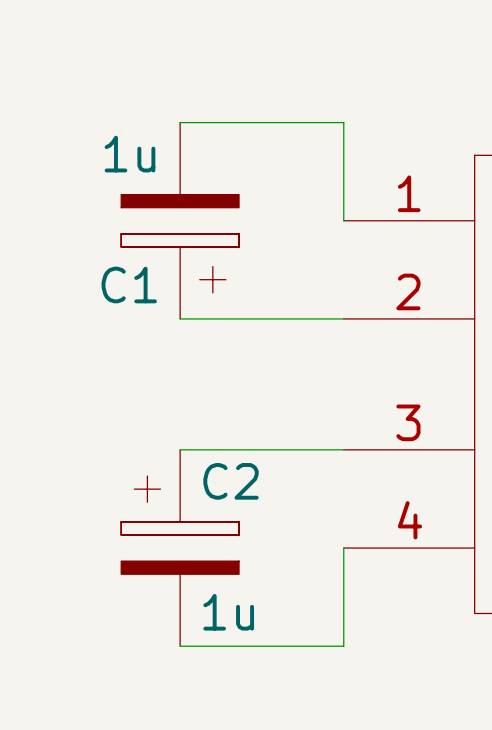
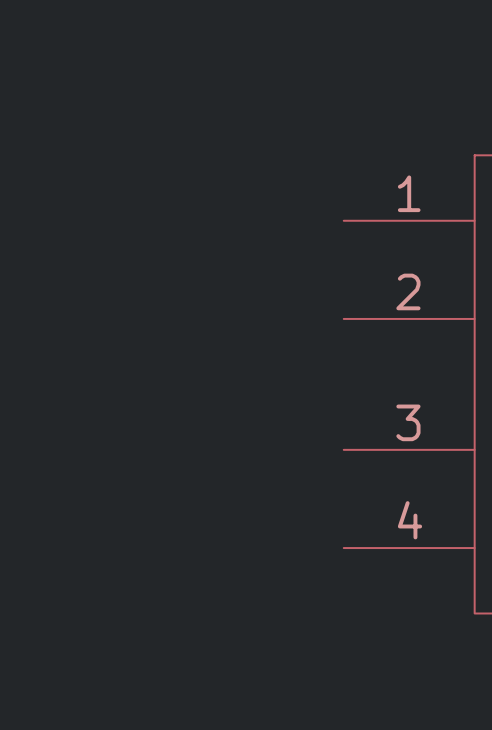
wire: (180, 122) (343, 122) (343, 220) -> none
C1: 1u (180, 220) -> none
wire: (180, 318) (343, 318) -> none
wire: (180, 449) (343, 449) -> none
C2: 1u (180, 548) -> none
wire: (343, 548) (343, 646) (180, 646) -> none

